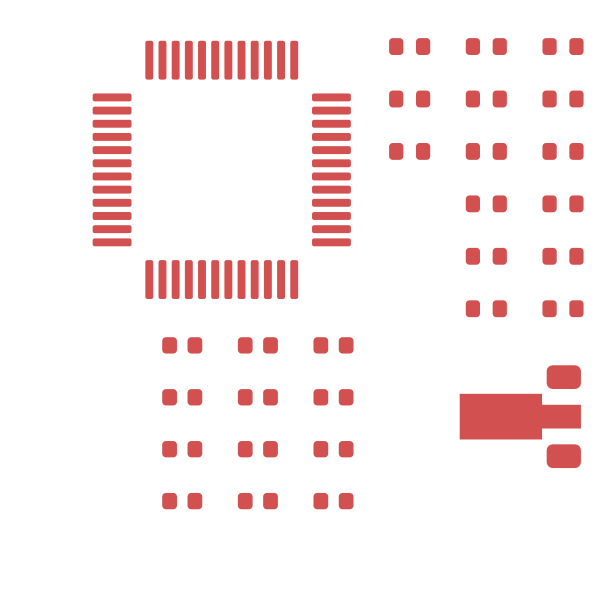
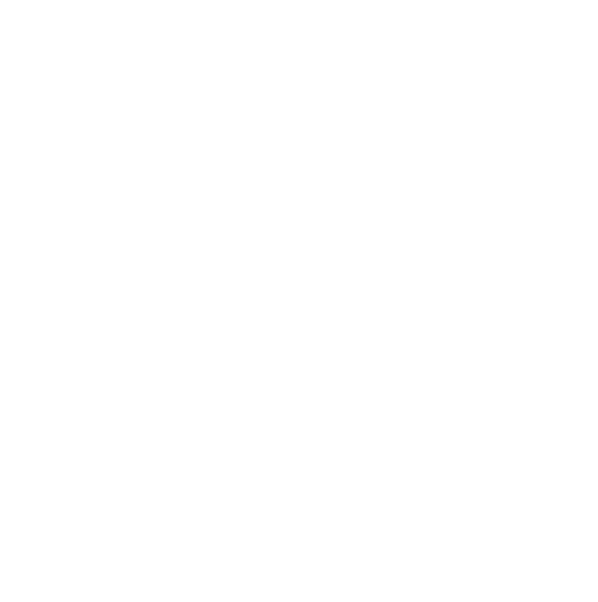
part: (409, 46) -> none
part: (486, 46) -> none
part: (563, 46) -> none
part: (409, 98) -> none
part: (486, 98) -> none
part: (563, 98) -> none
part: (409, 151) -> none
part: (486, 151) -> none
part: (563, 151) -> none
part: (221, 169) -> none
part: (486, 203) -> none
part: (563, 203) -> none
part: (486, 256) -> none
part: (563, 256) -> none
part: (486, 308) -> none
part: (563, 308) -> none
part: (182, 345) -> none
part: (257, 345) -> none
part: (333, 345) -> none
part: (182, 397) -> none
part: (257, 397) -> none
part: (333, 397) -> none
part: (520, 416) -> none
part: (182, 449) -> none
part: (257, 449) -> none
part: (333, 449) -> none
part: (182, 501) -> none
part: (257, 501) -> none
part: (333, 501) -> none

